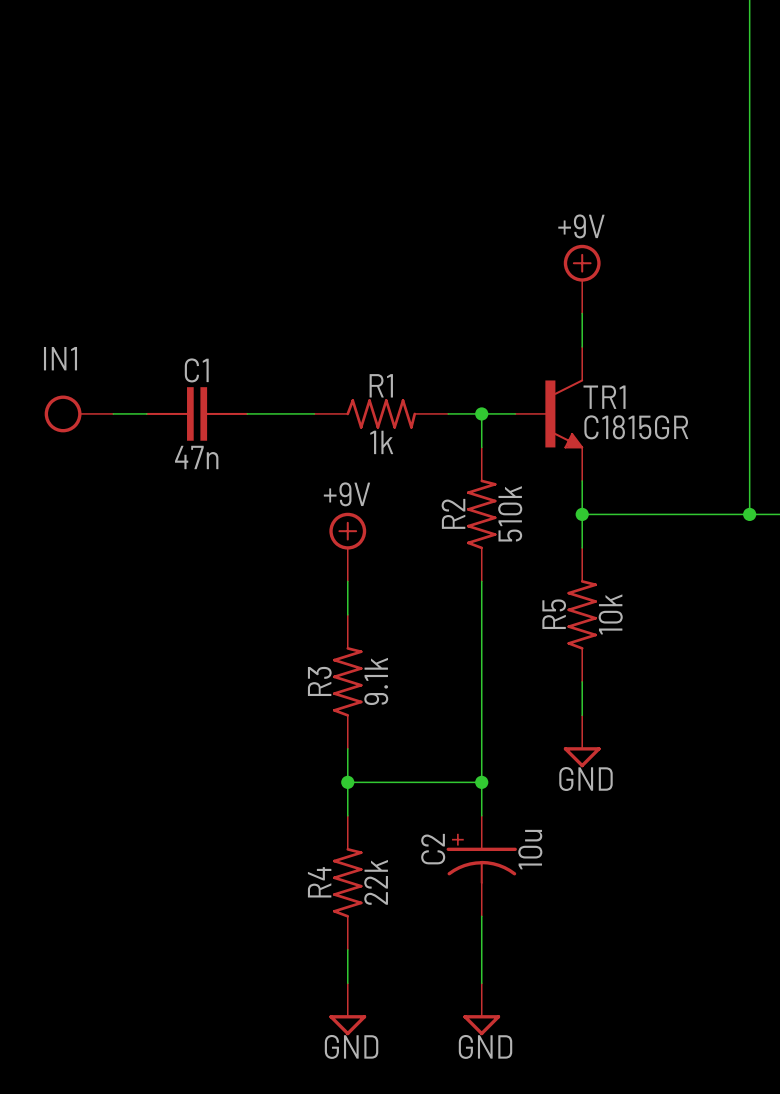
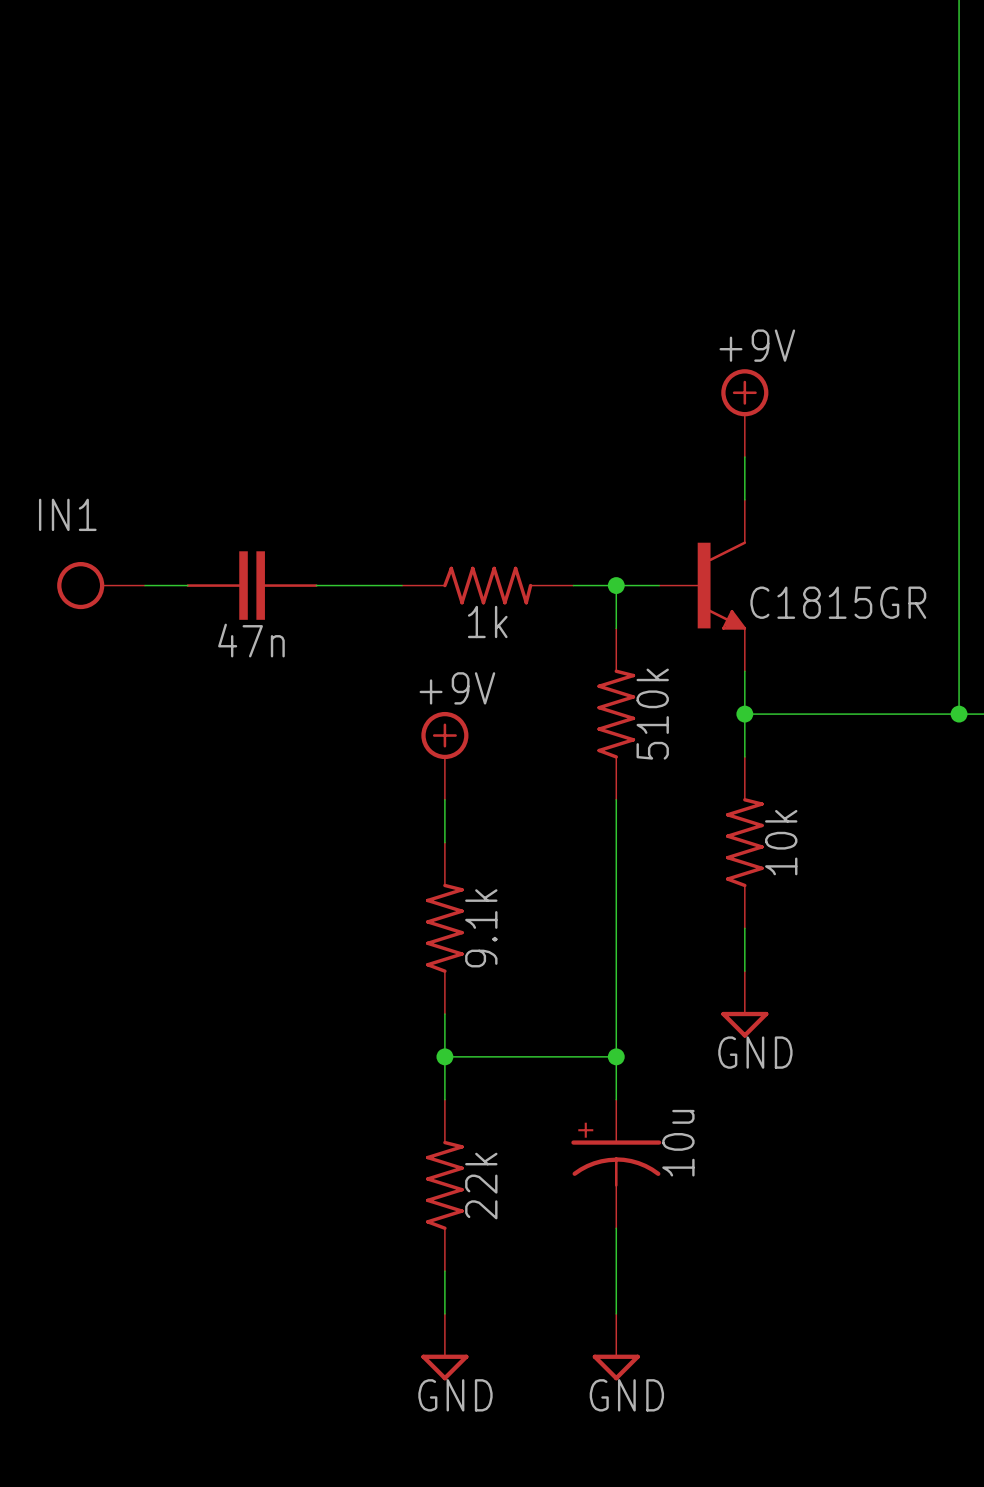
C1 name: C1 (196, 370) -> none
R1 name: R1 (381, 385) -> none
TR1 name: TR1 (604, 397) -> none
R2 name: R2 (453, 513) -> none
R5 name: R5 (554, 614) -> none
R3 name: R3 (319, 681) -> none
C2 name: C2 (433, 849) -> none
R4 name: R4 (319, 882) -> none

